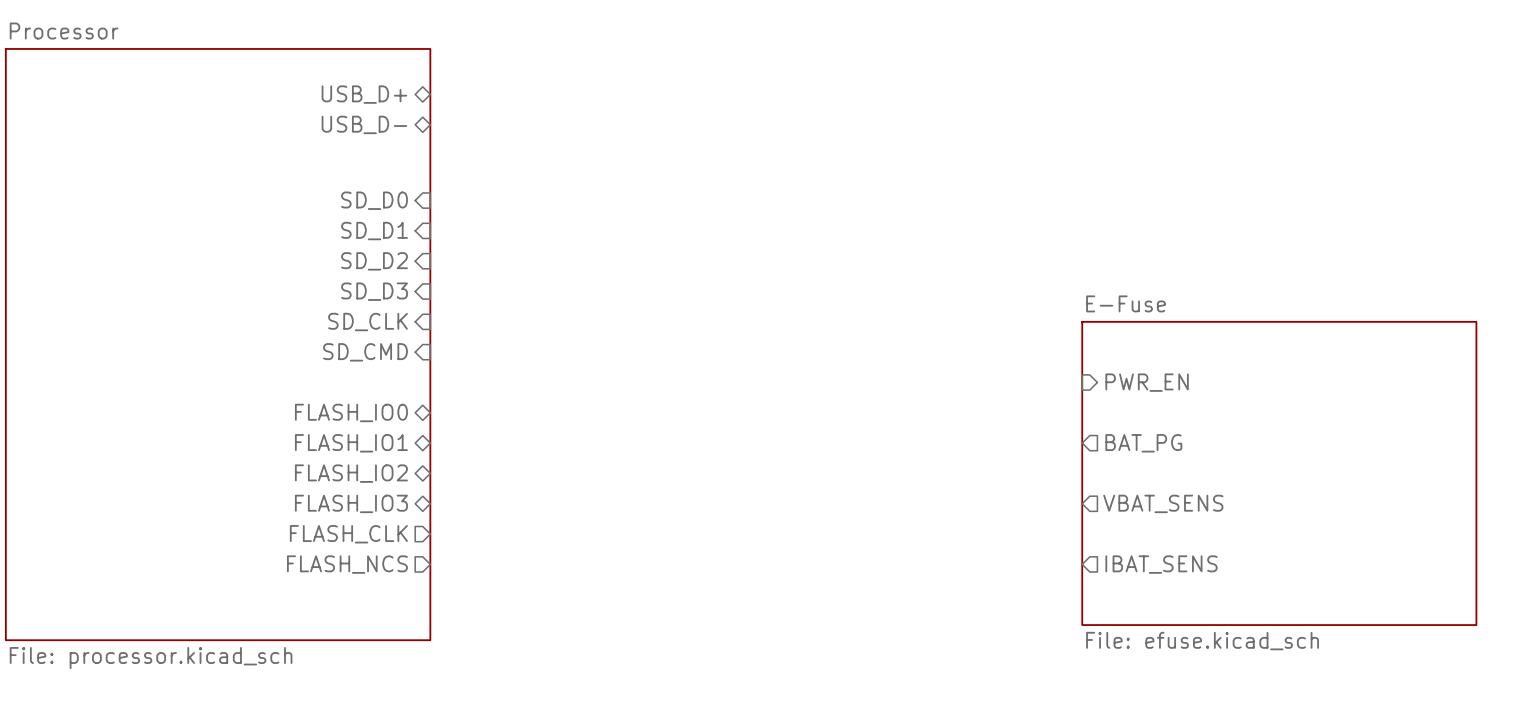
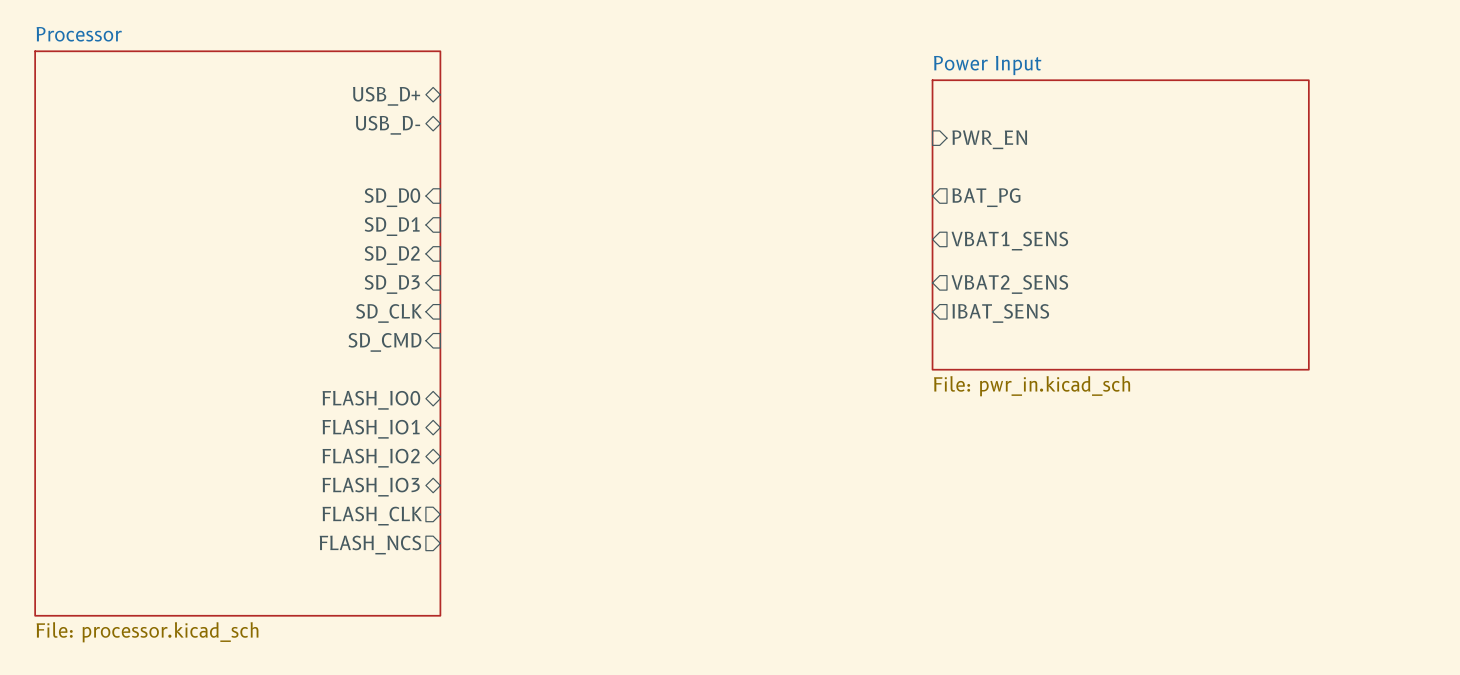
sheet Power Input: none -> File: pwr_in.kicad_sch (1120, 224)
sheet pin: none -> VBAT1_SENS (1009, 241)
sheet pin: none -> VBAT2_SENS (1009, 284)
sheet pin position: PWR_EN (1147, 382) -> PWR_EN (989, 139)
sheet pin position: BAT_PG (1143, 443) -> BAT_PG (986, 197)
sheet E-Fuse: File: efuse.kicad_sch (1279, 473) -> none
sheet pin: VBAT_SENS (1163, 503) -> none
sheet pin position: IBAT_SENS (1161, 564) -> IBAT_SENS (1000, 313)

